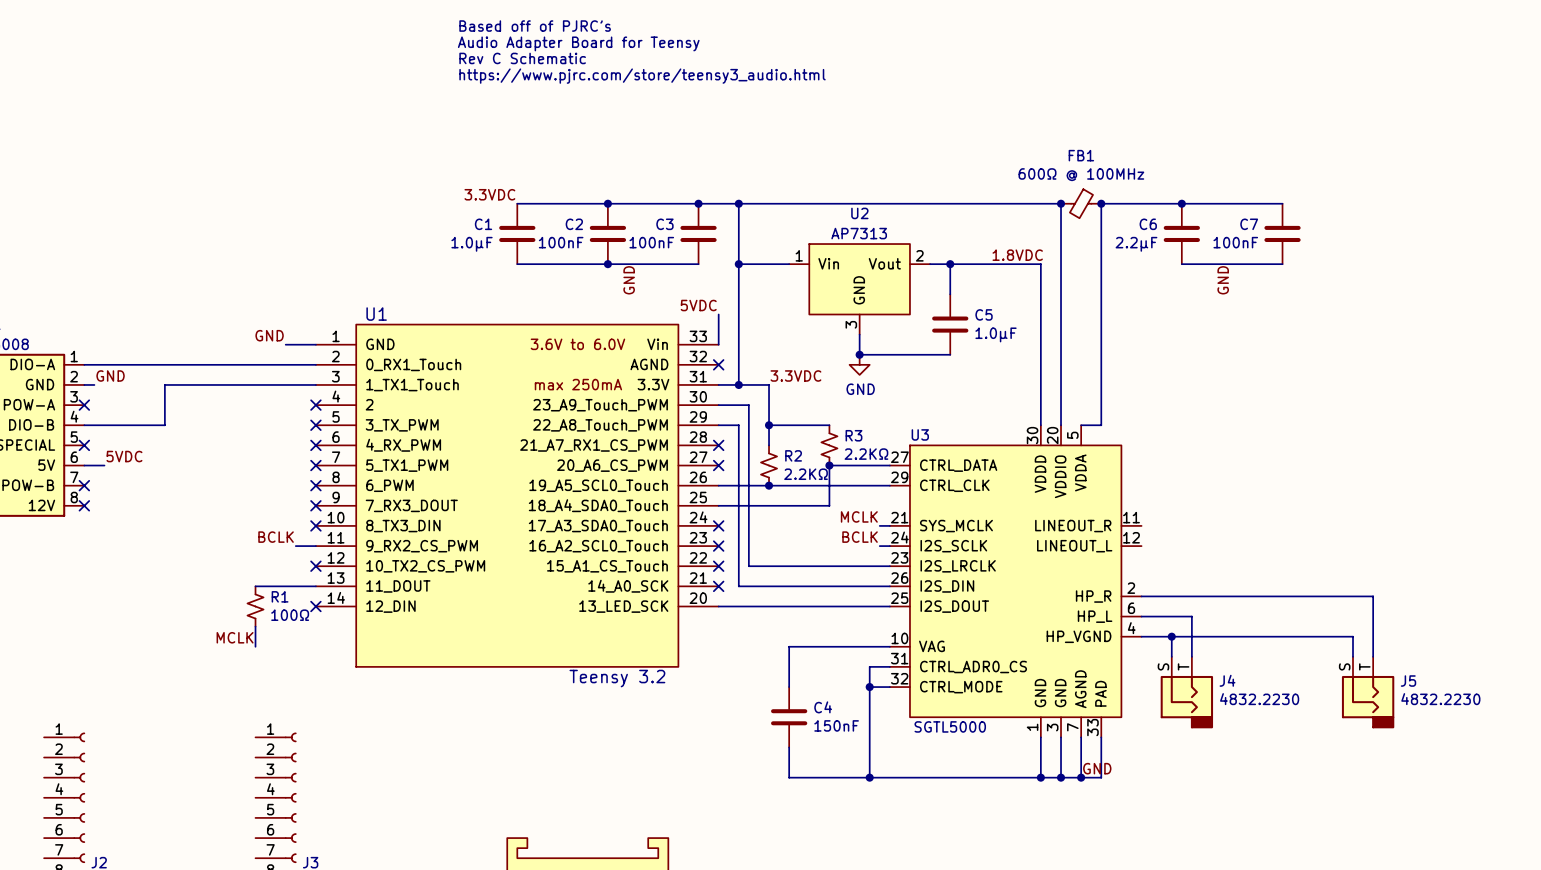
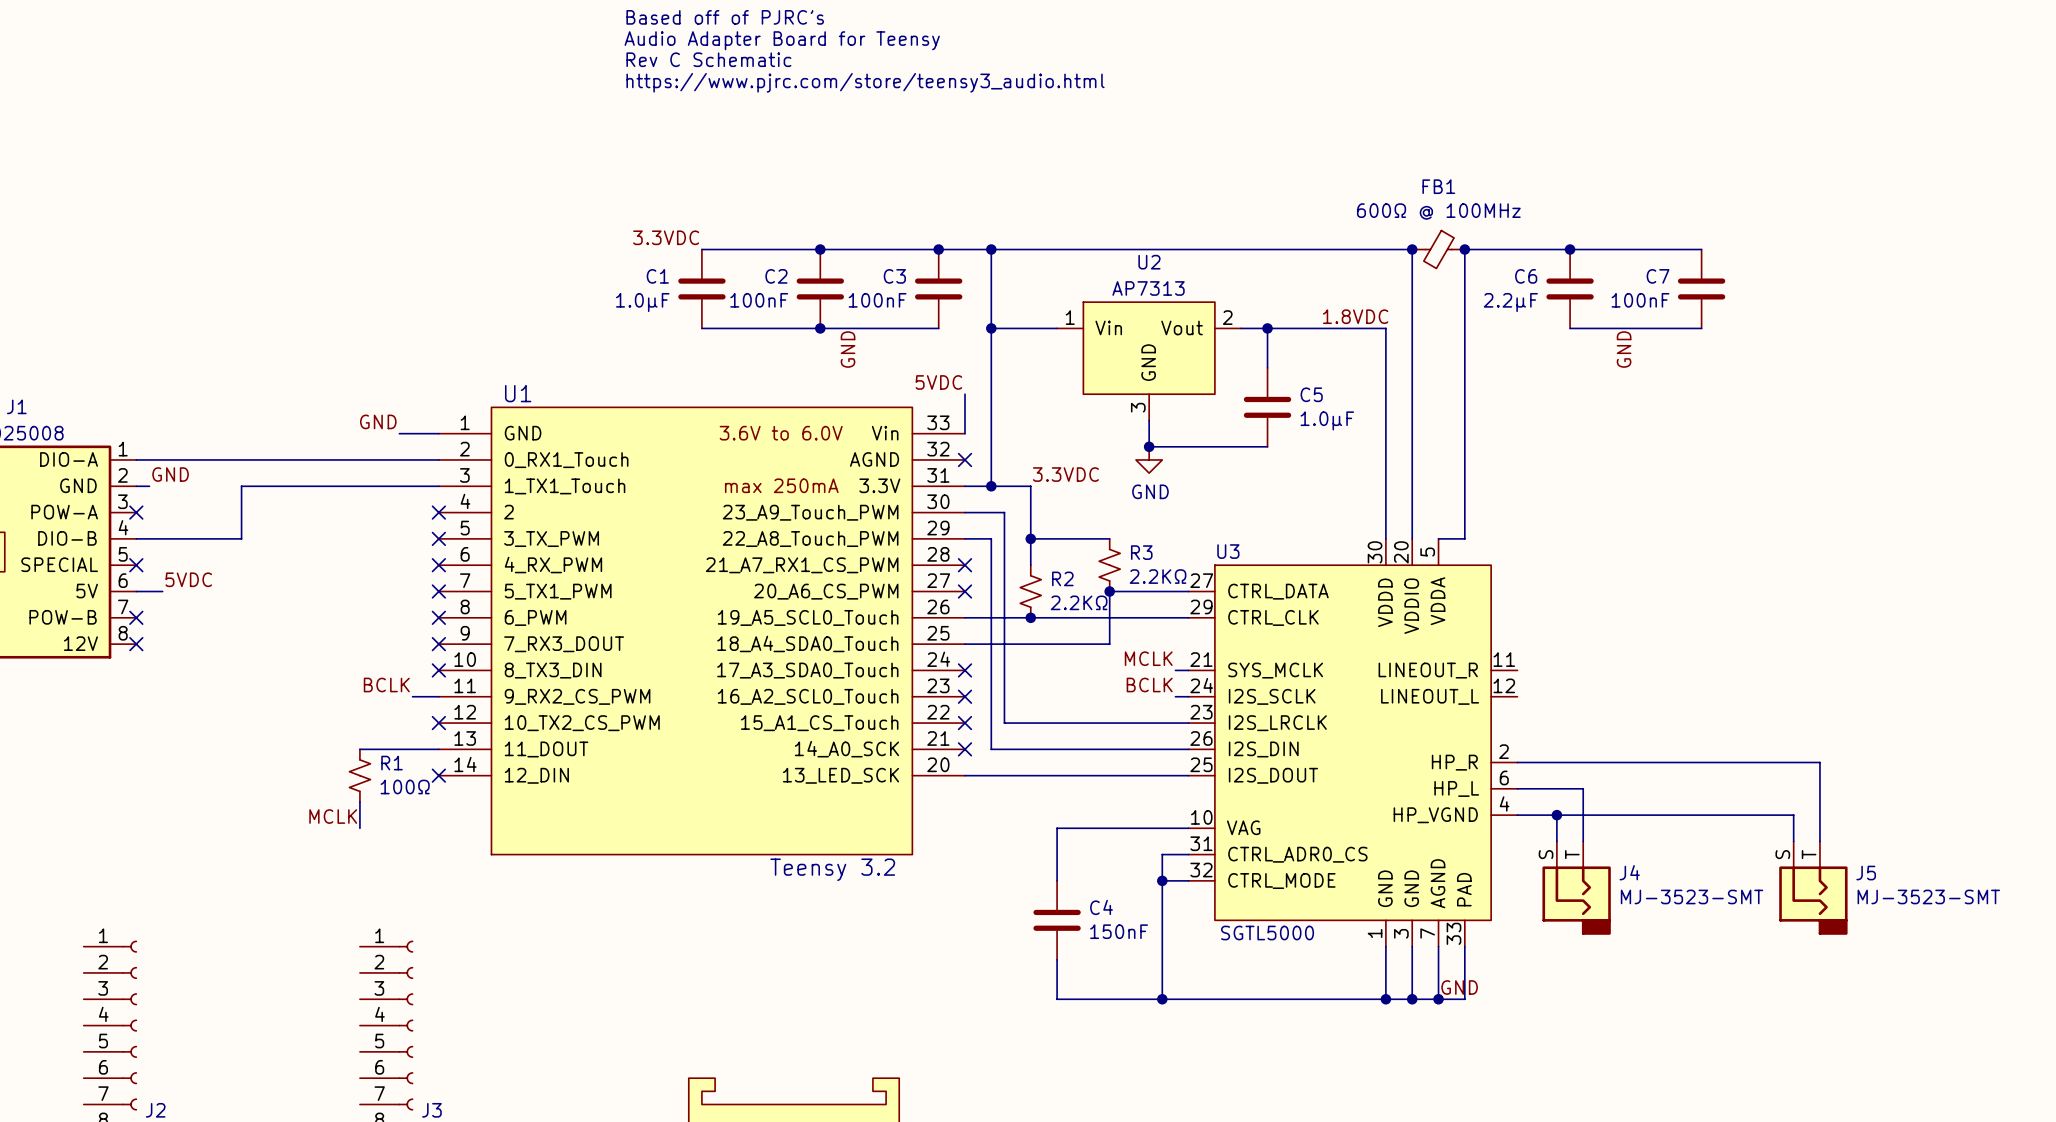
J4 value: 4832.2230 (1259, 699) -> MJ-3523-SMT (1692, 896)
J5 value: 4832.2230 (1440, 699) -> MJ-3523-SMT (1928, 896)

